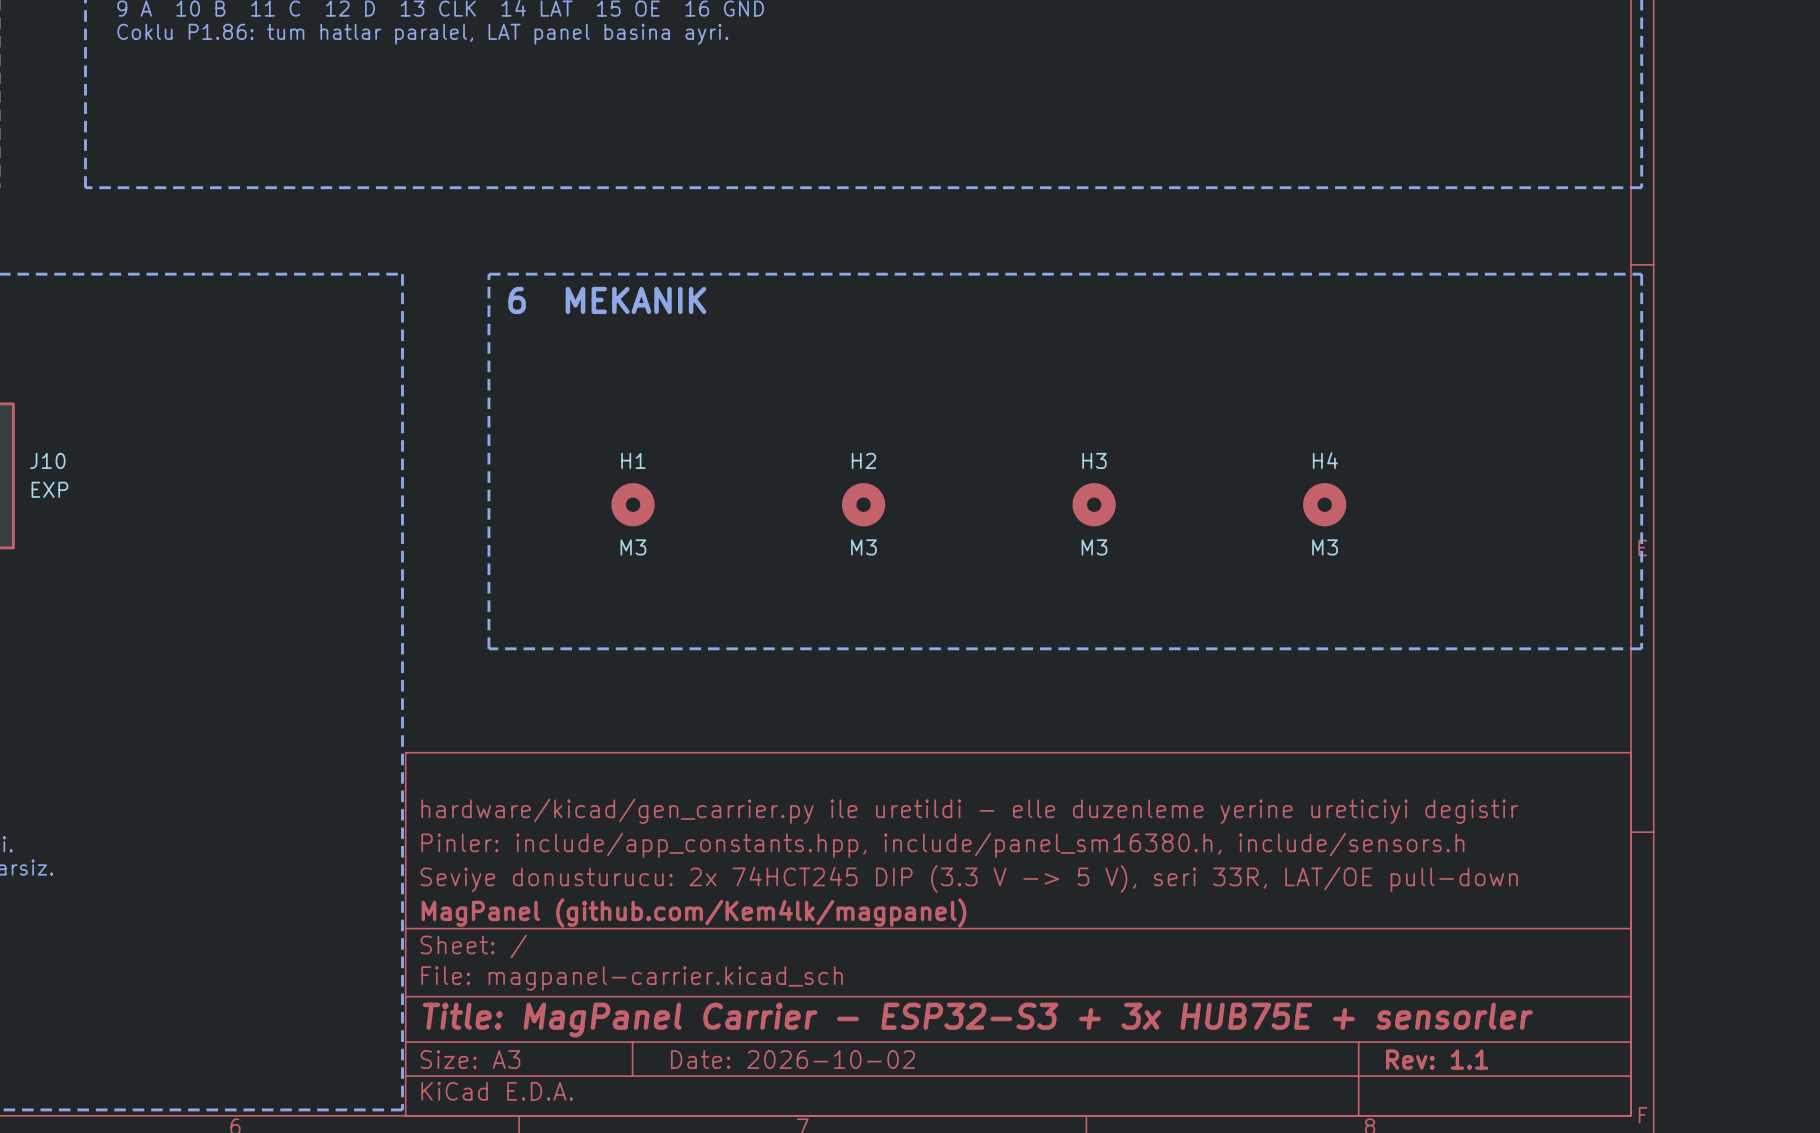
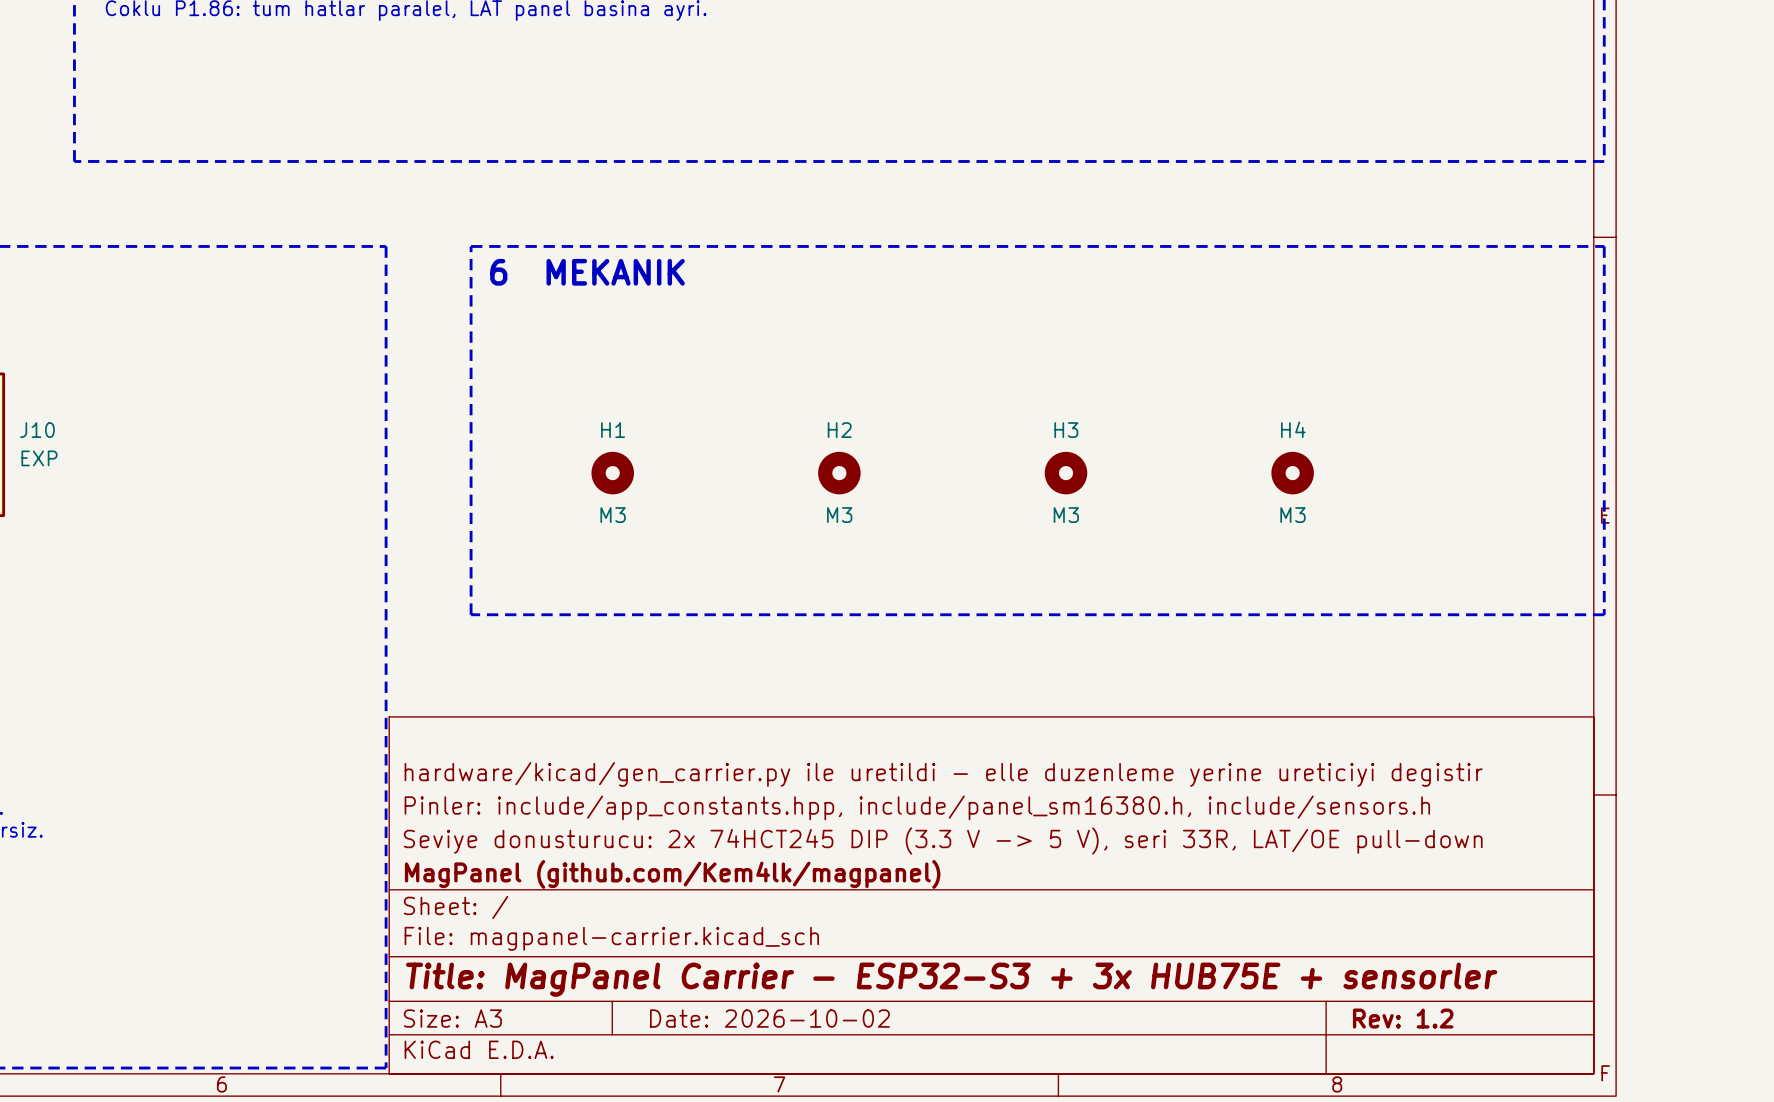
title block: Rev: 1.1 (1437, 1059) -> Rev: 1.2 (1403, 1018)

